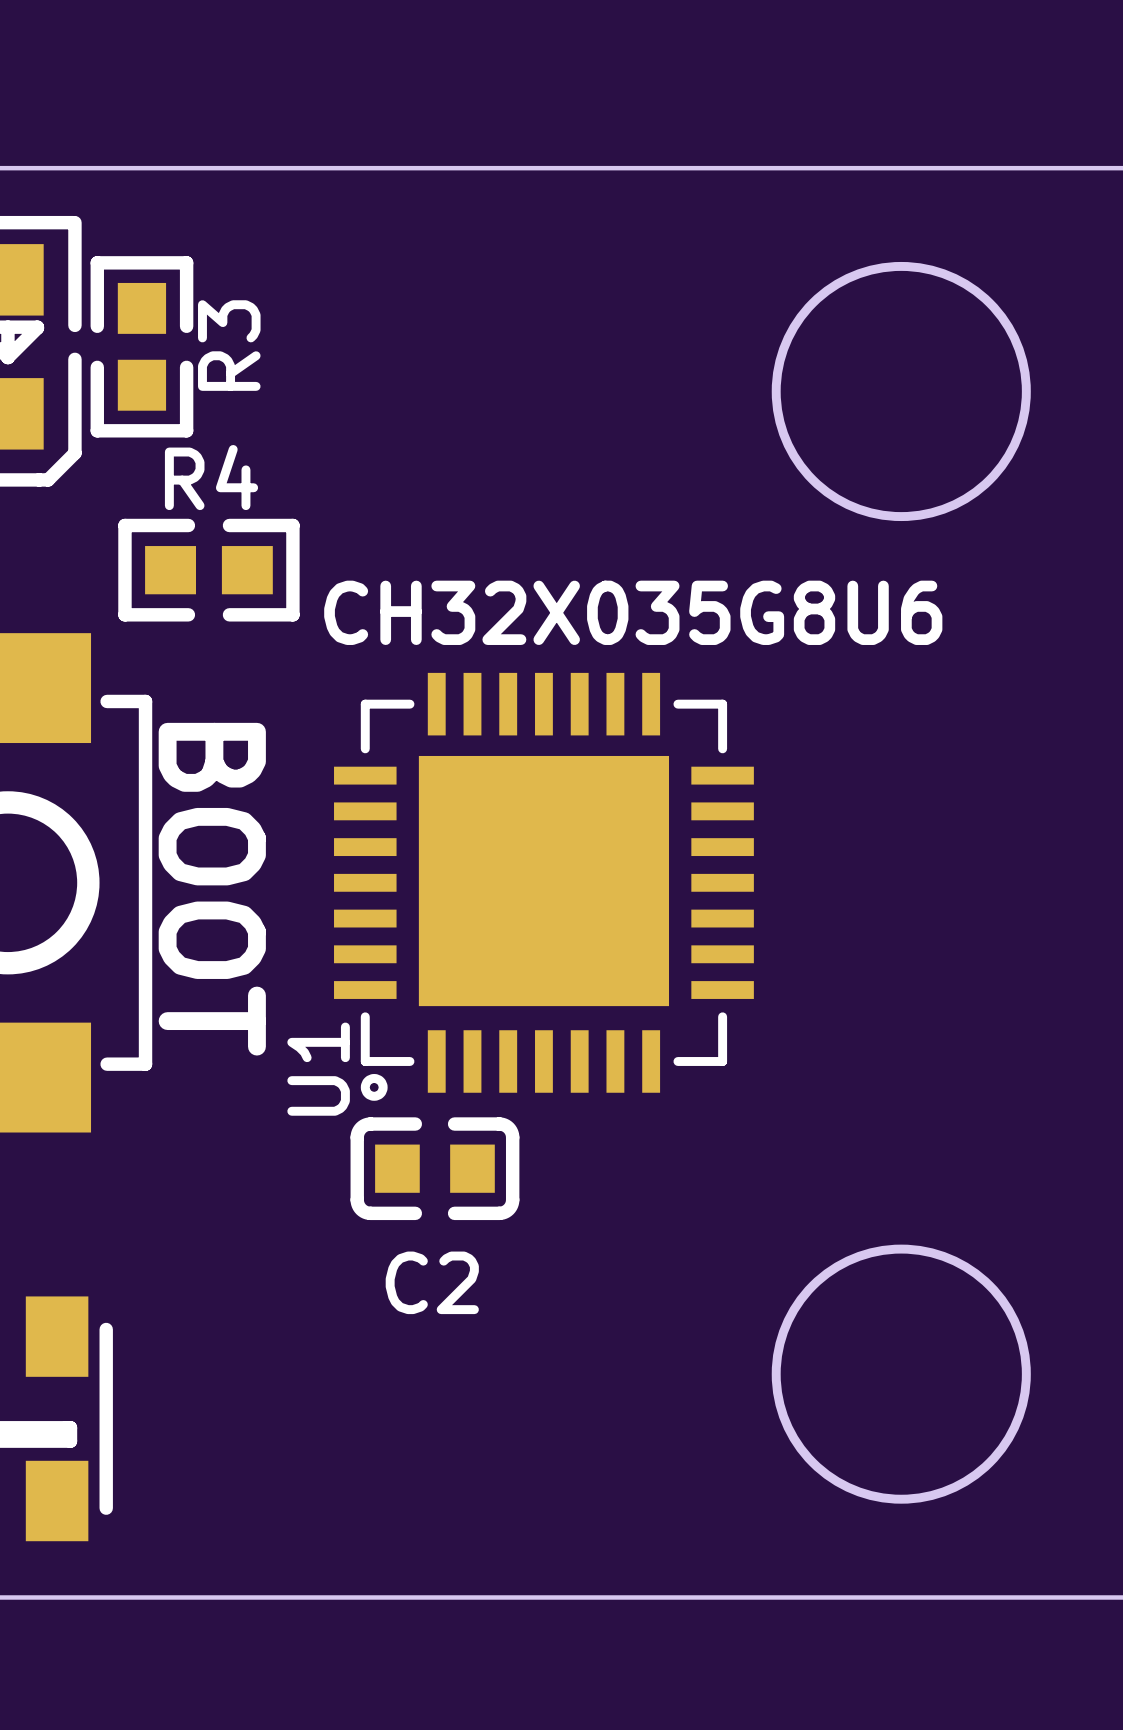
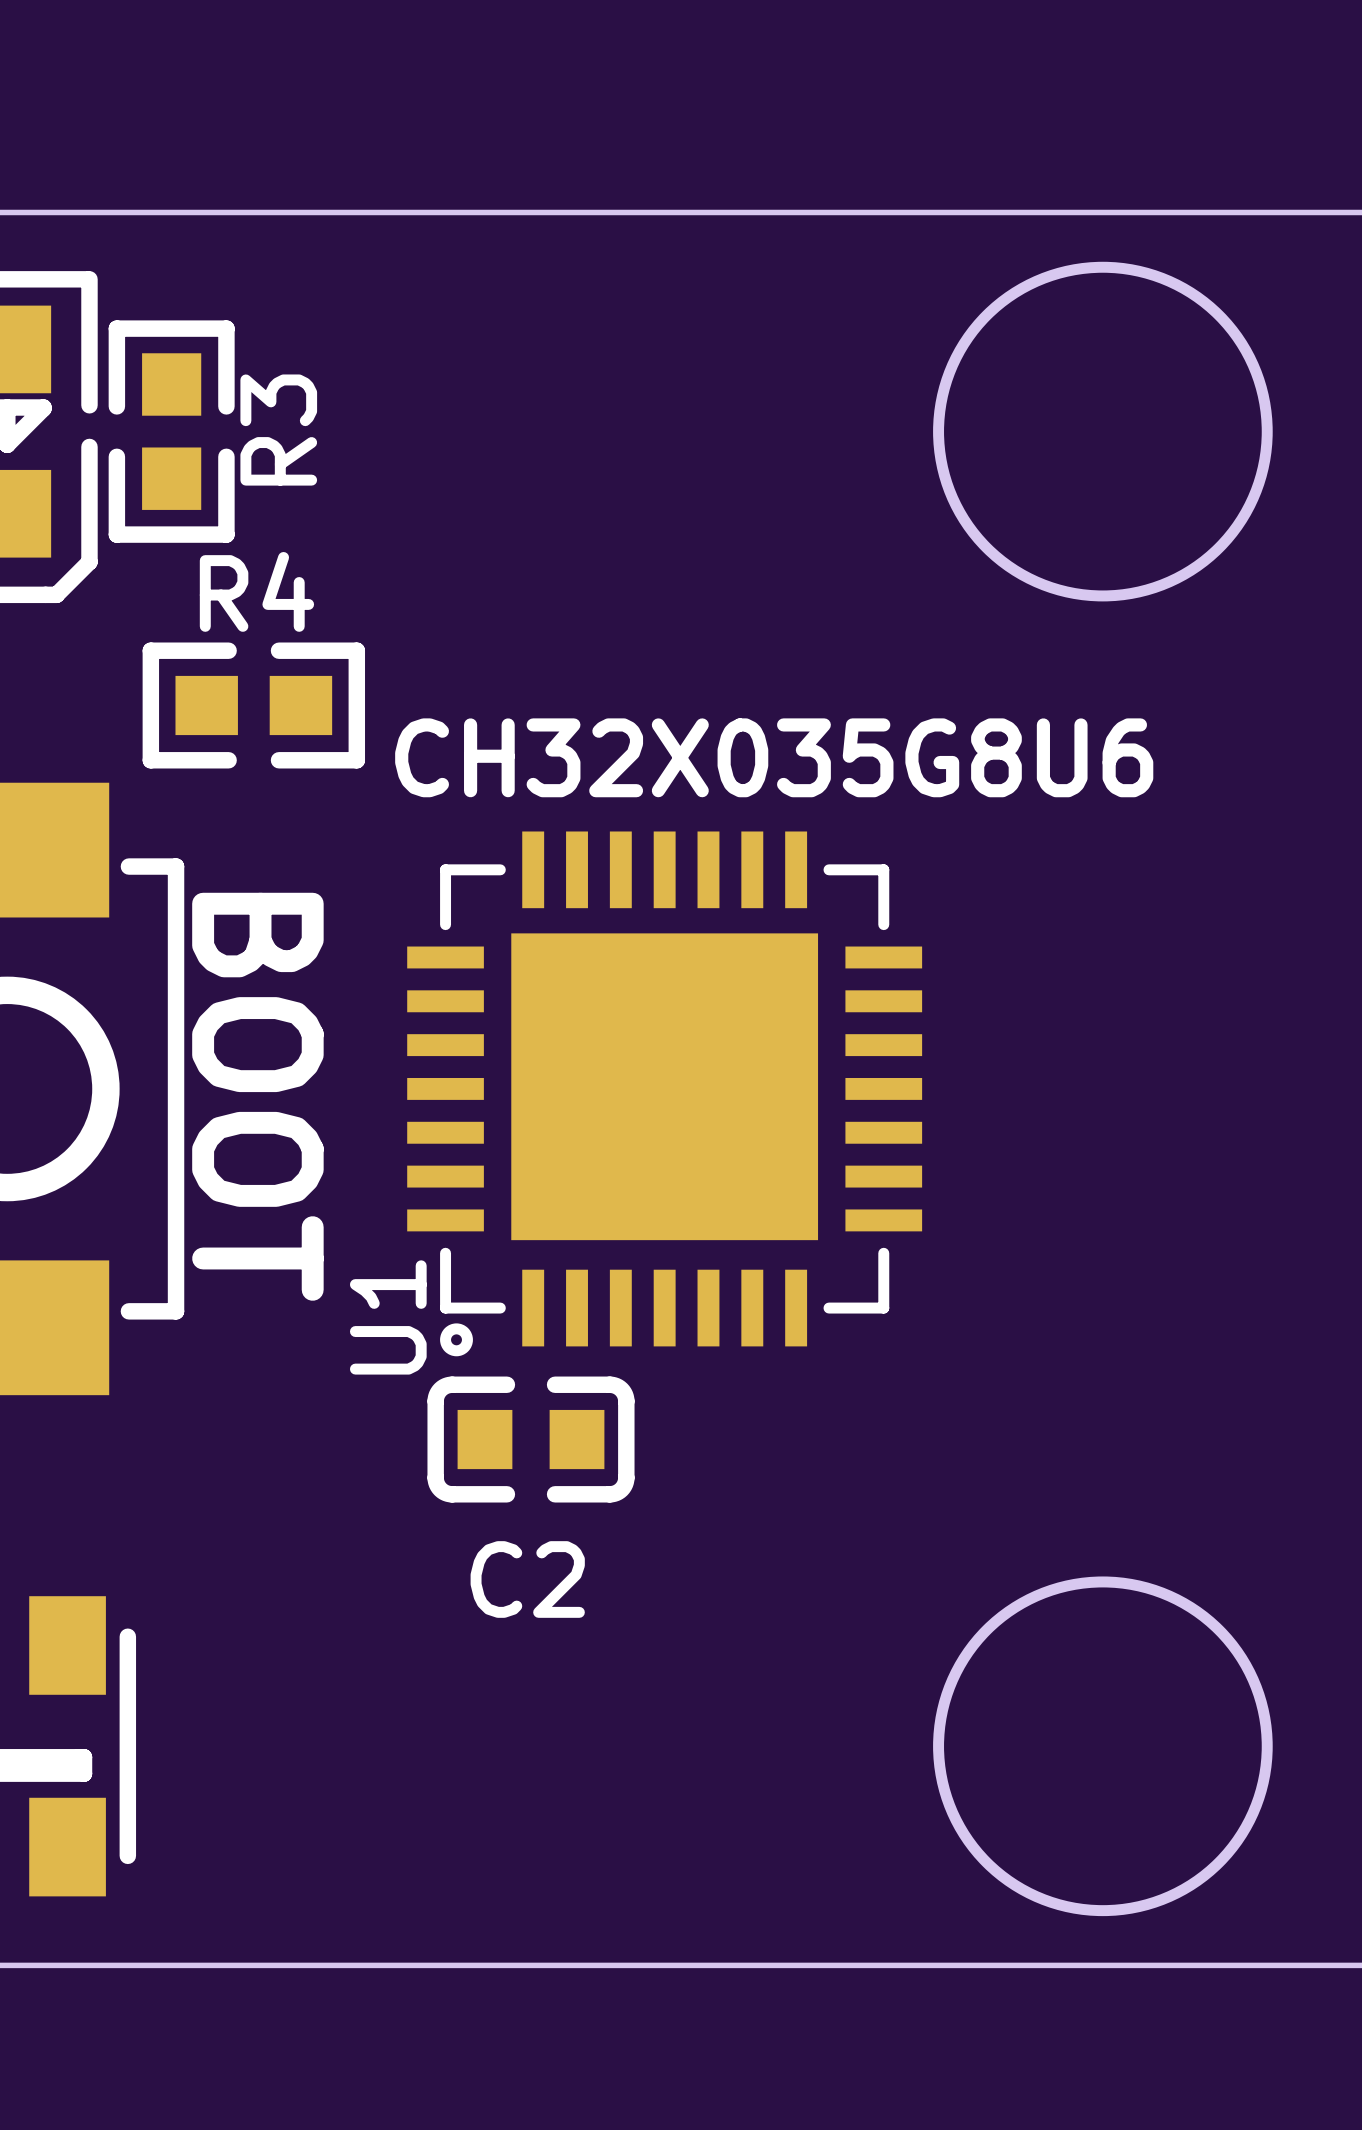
round board edge position: (901, 391) -> (1102, 431)
round board edge position: (901, 1374) -> (1102, 1746)

